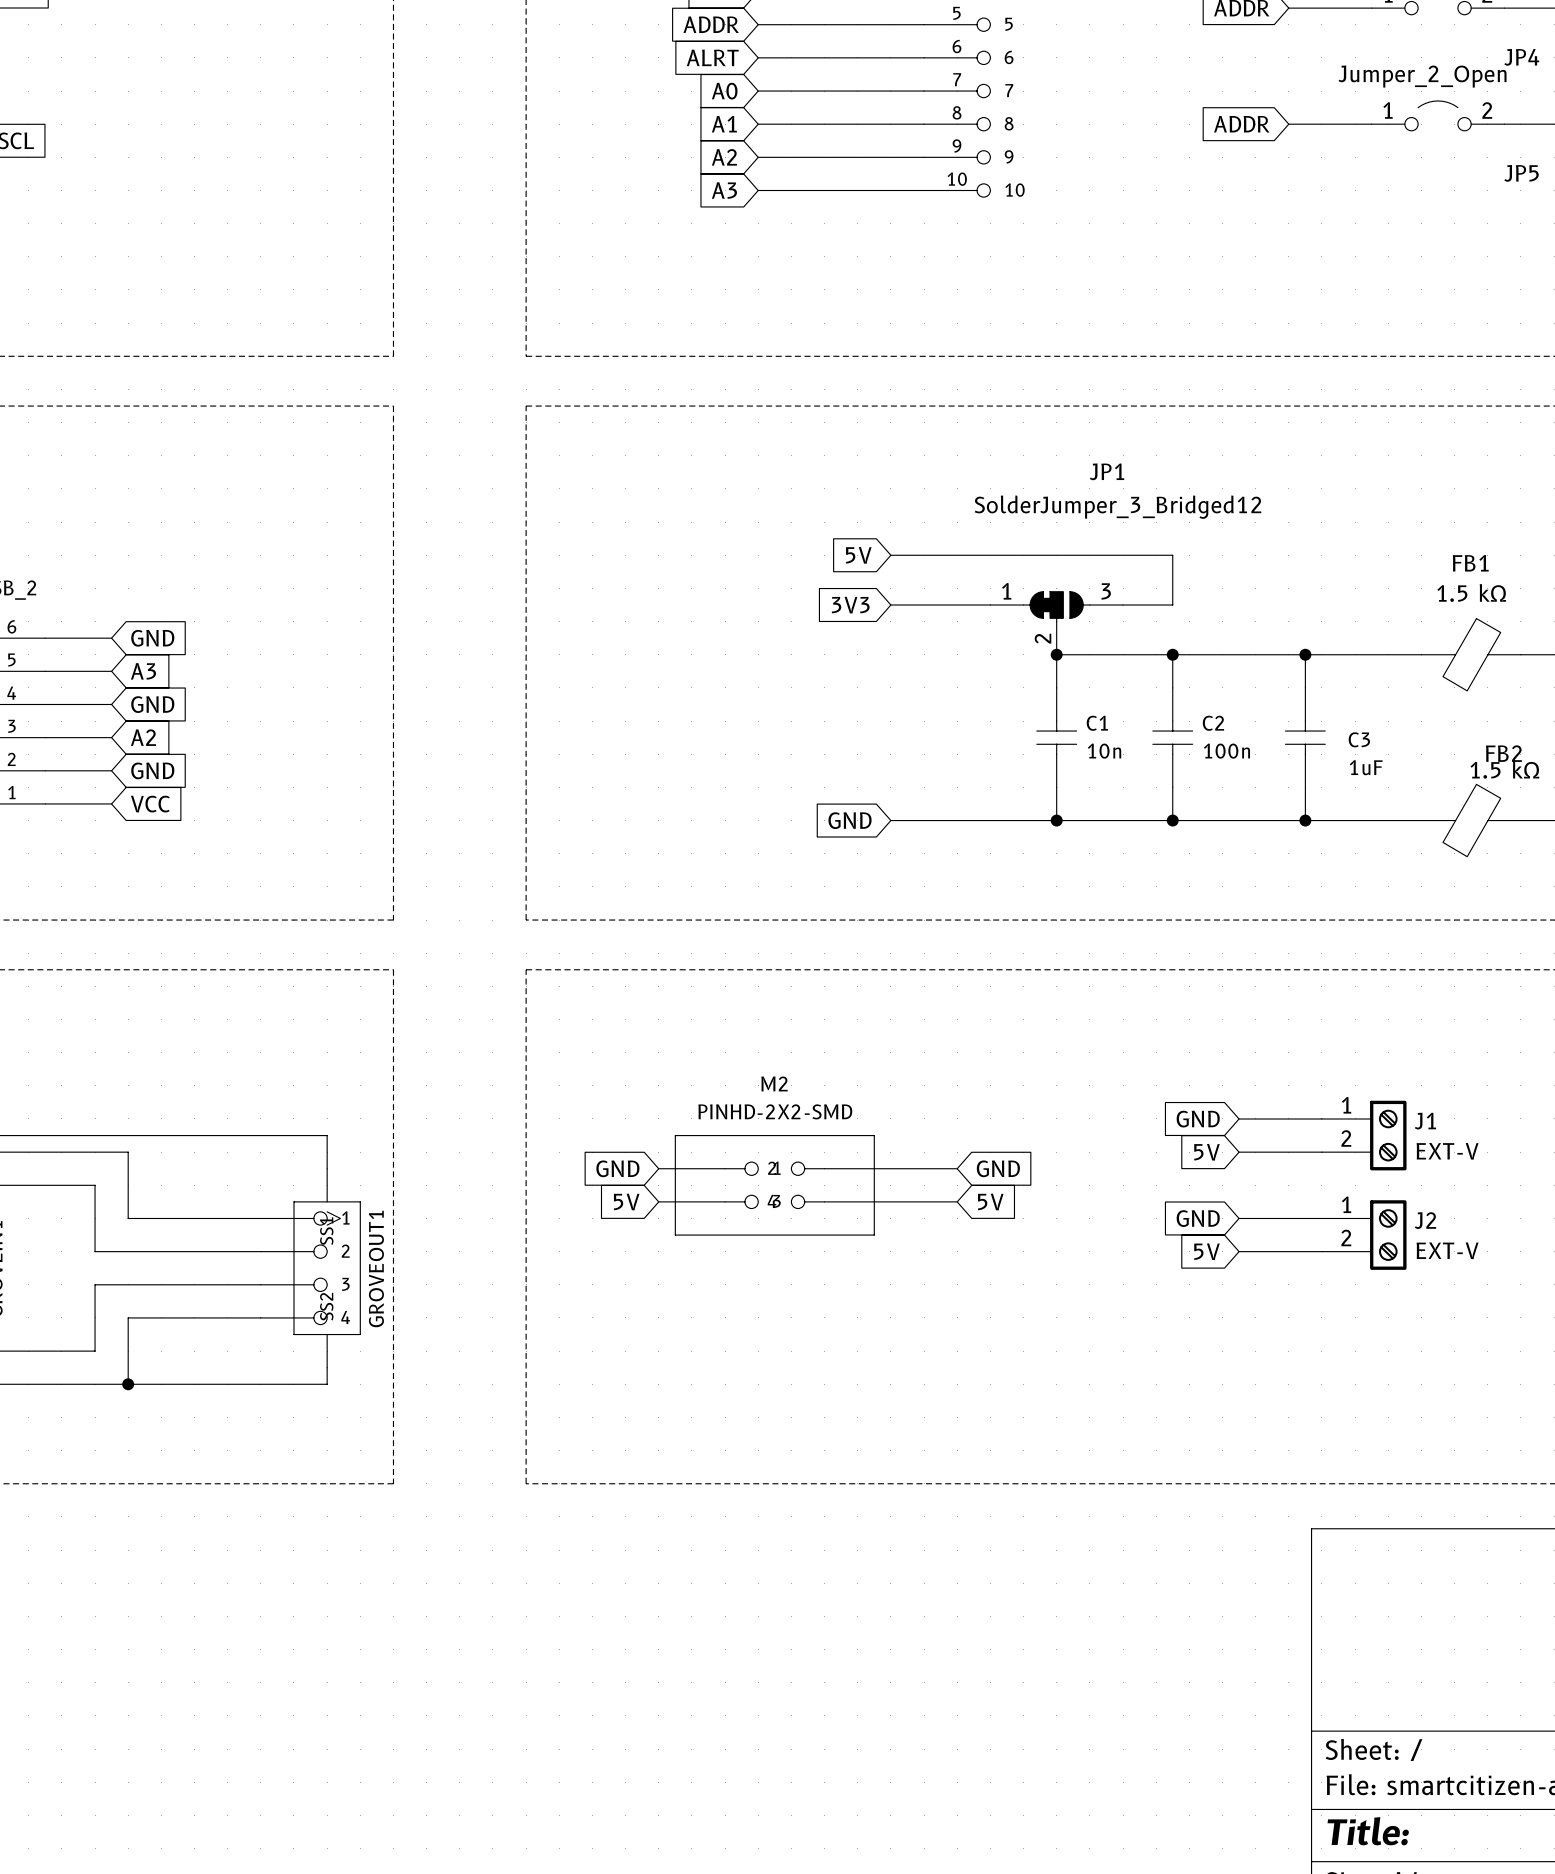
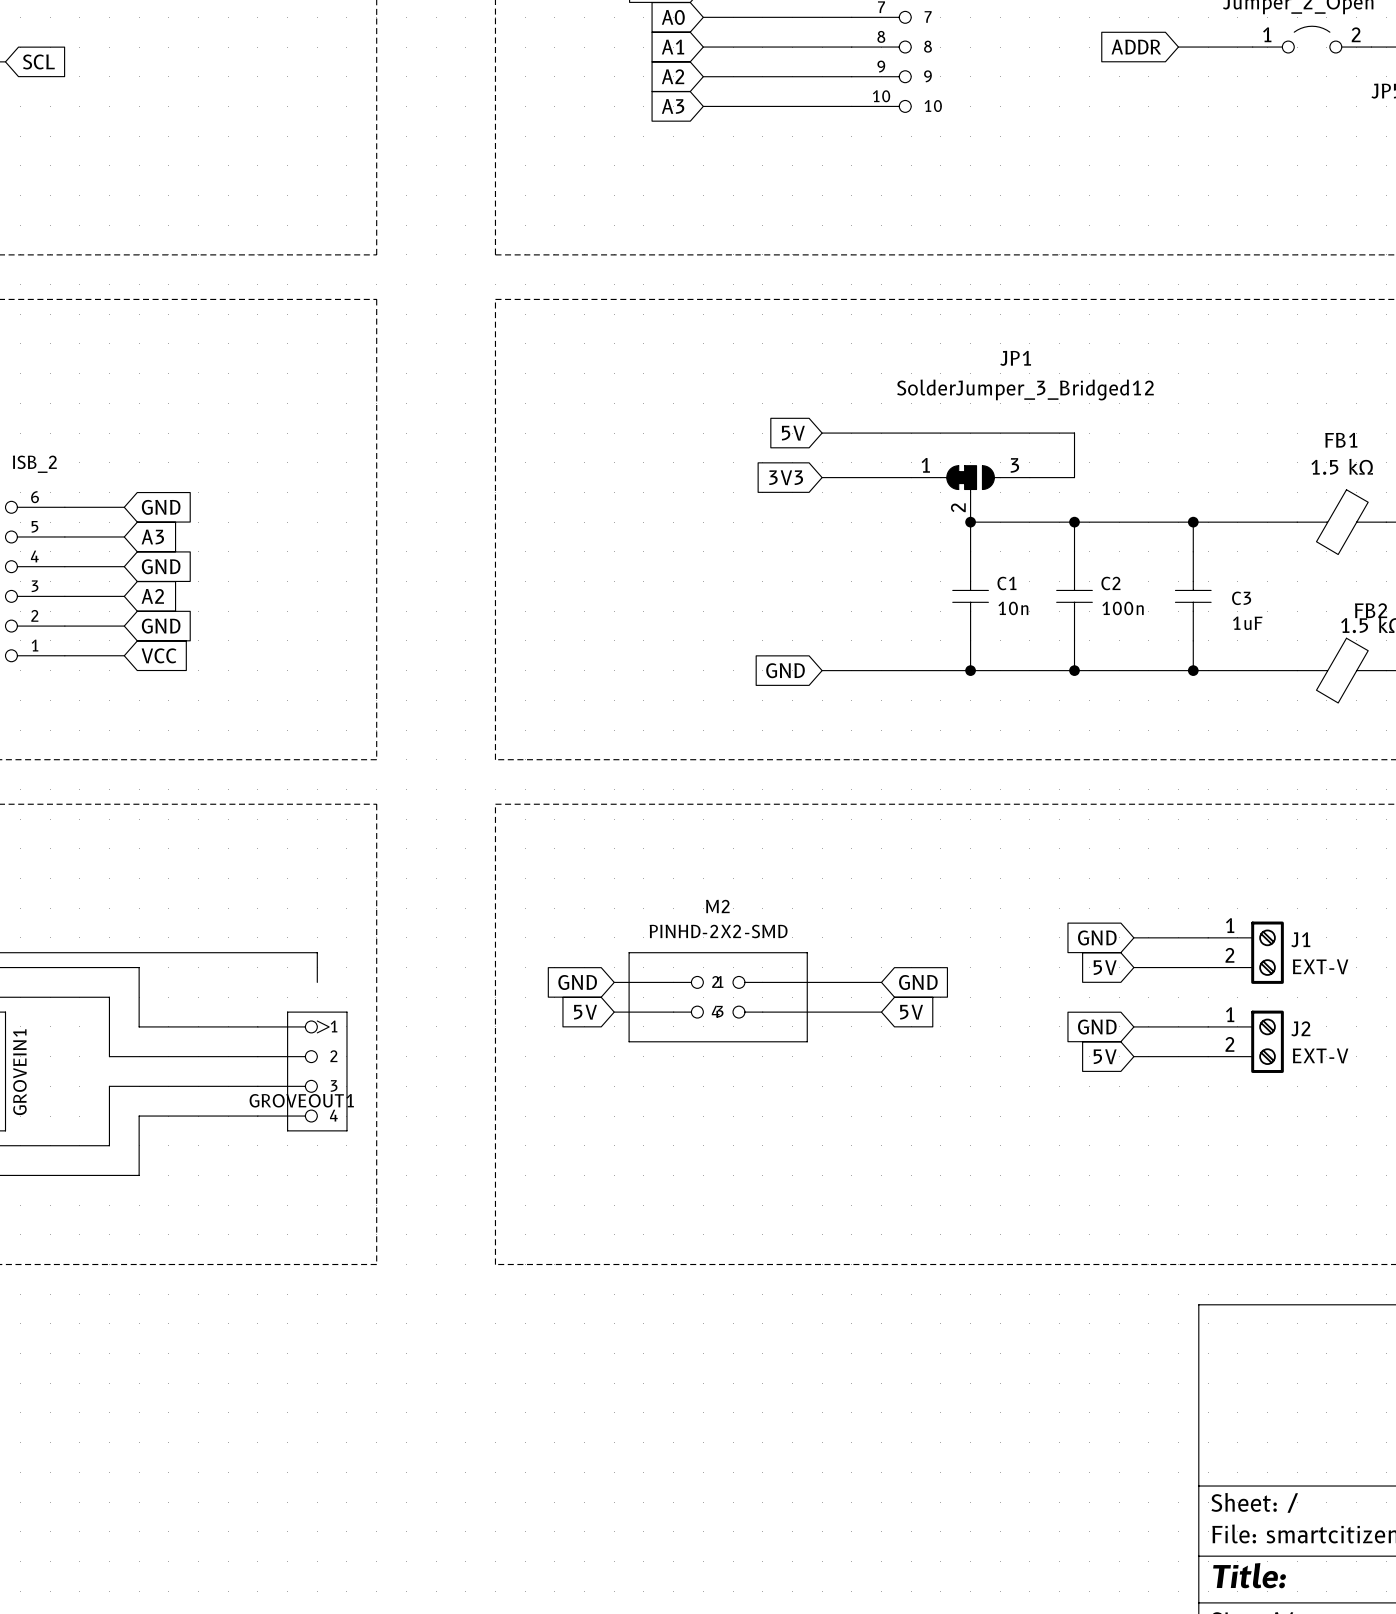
GROVEOUT1 symbol: [260, 1168, 361, 1368] -> [257, 1012, 347, 1131]
GROVEOUT1 name position: GROVEOUT1 (376, 1269) -> GROVEOUT1 (301, 1100)
wire: (327, 1367) (327, 1384) (128, 1384) -> none
junction: (128, 1384) -> none

